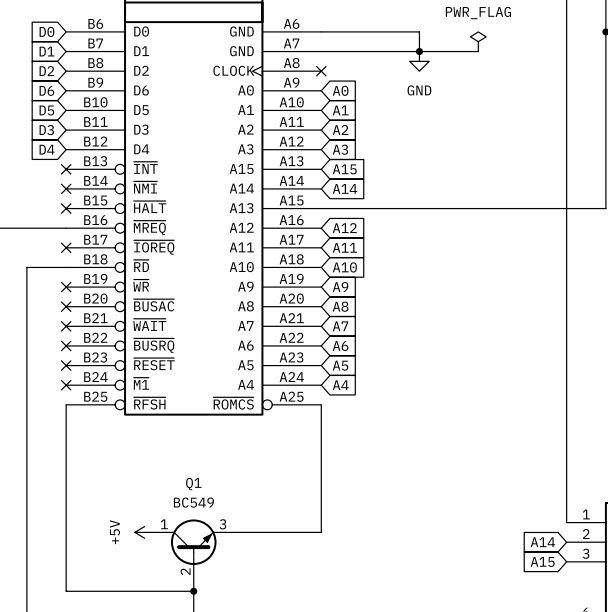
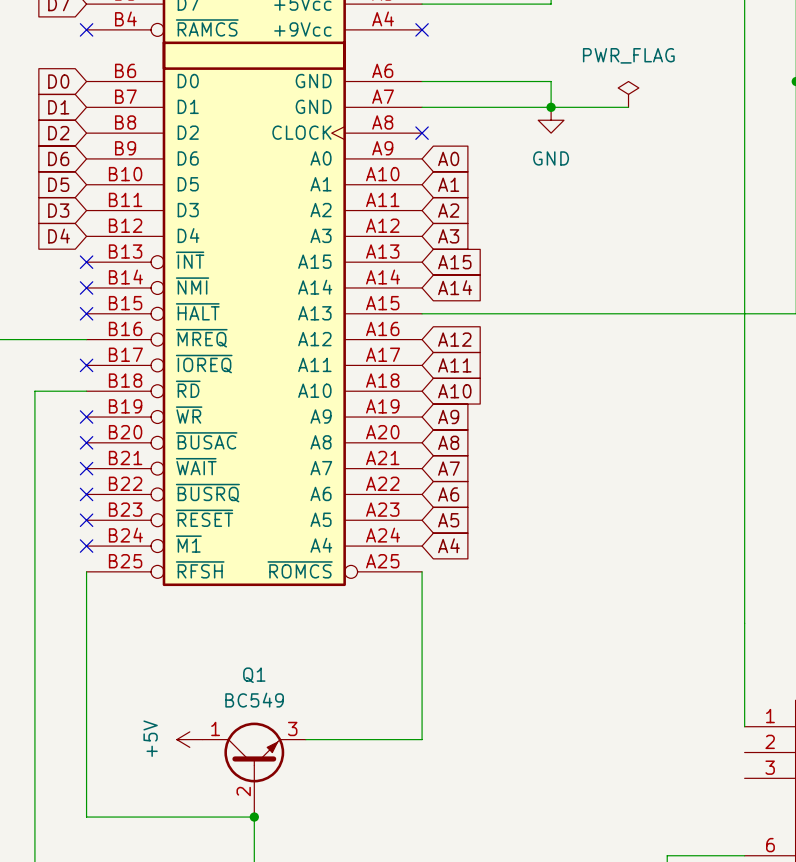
global label: A14 (542, 542) -> none
global label: A15 (542, 561) -> none

